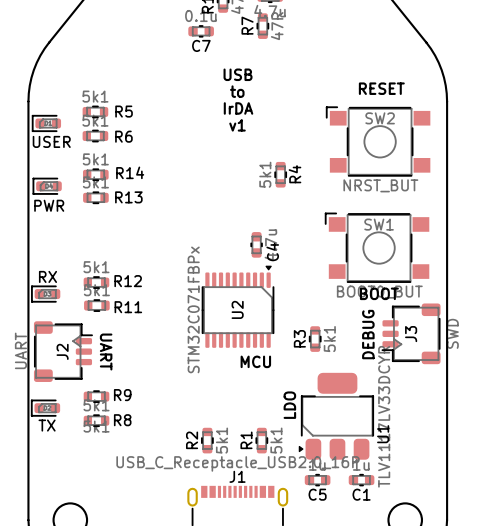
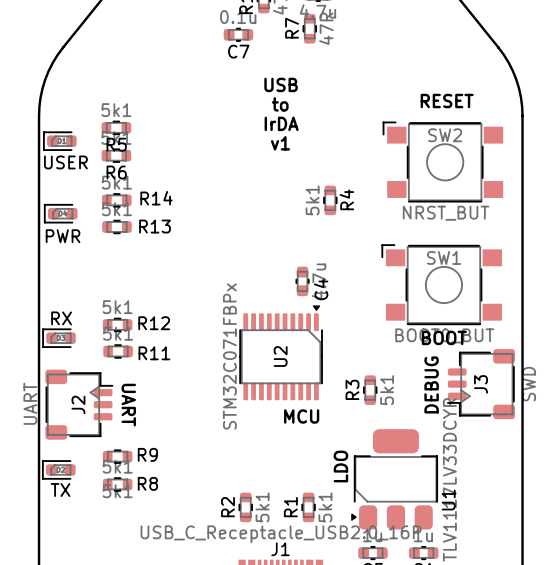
R5 name position: R5 (124, 111) -> R5 (116, 144)
R6 name position: R6 (123, 136) -> R6 (116, 172)

